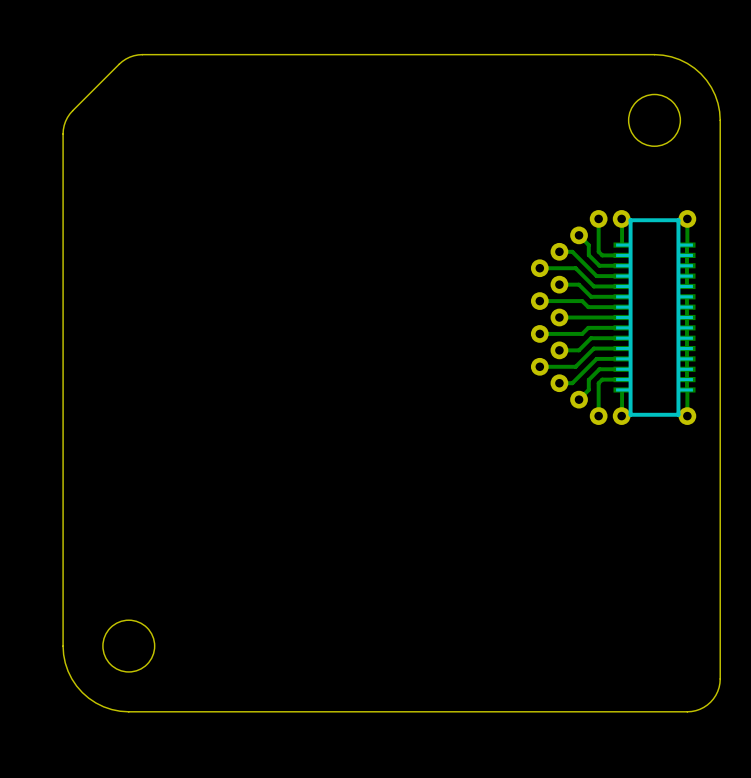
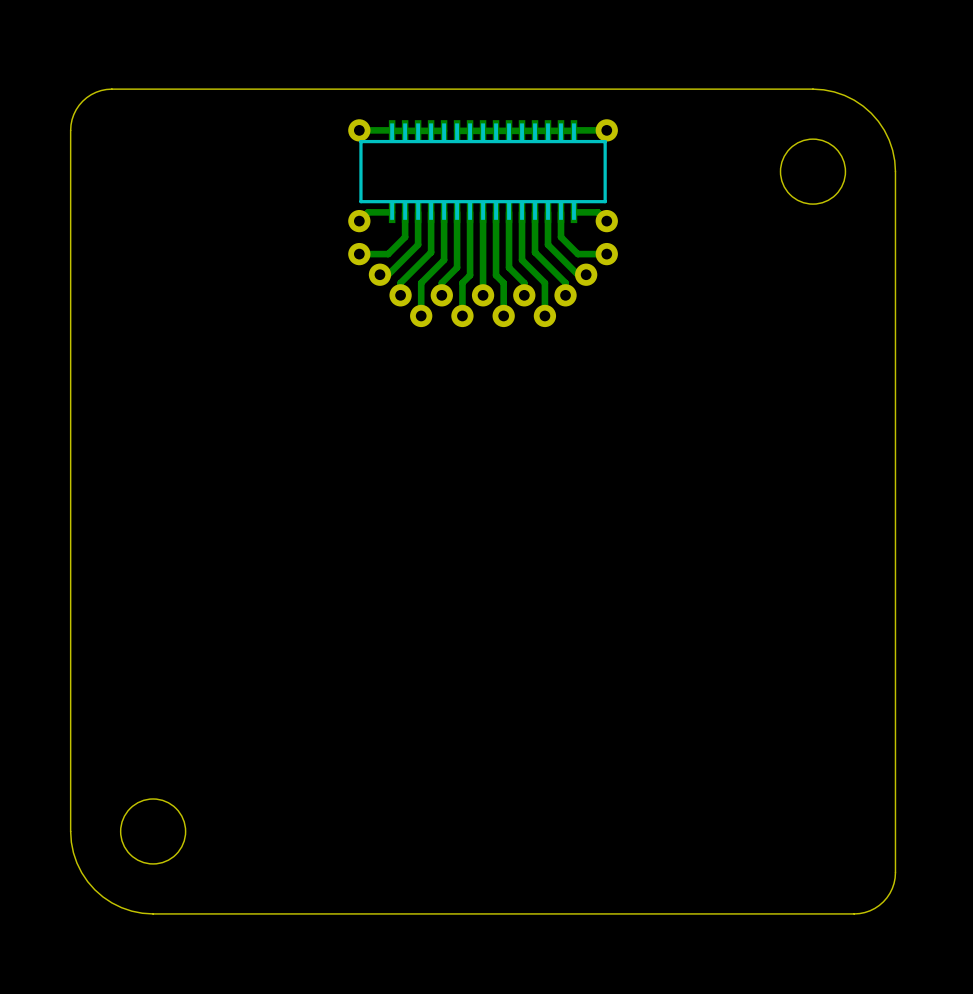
board edge: (142, 54) (129, 57) (119, 64) (69, 113) (64, 125) (63, 133) -> (170, 89) (106, 89) (91, 94) (82, 101) (76, 109) (71, 124) (70, 188)
part: none -> (483, 223)
part: (613, 317) -> none

